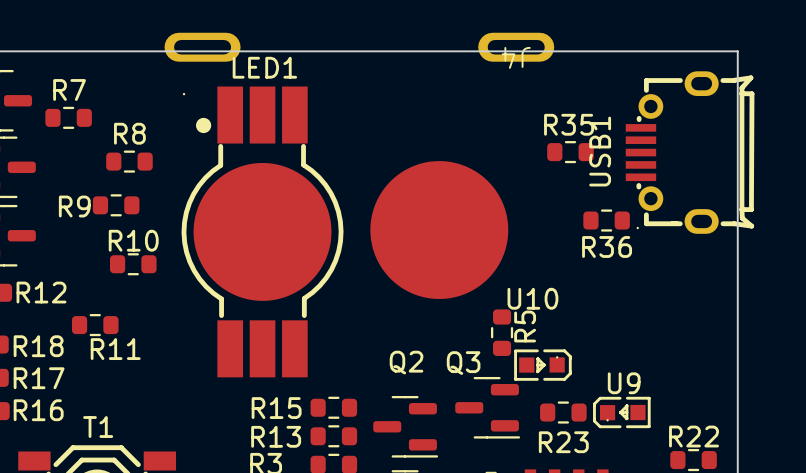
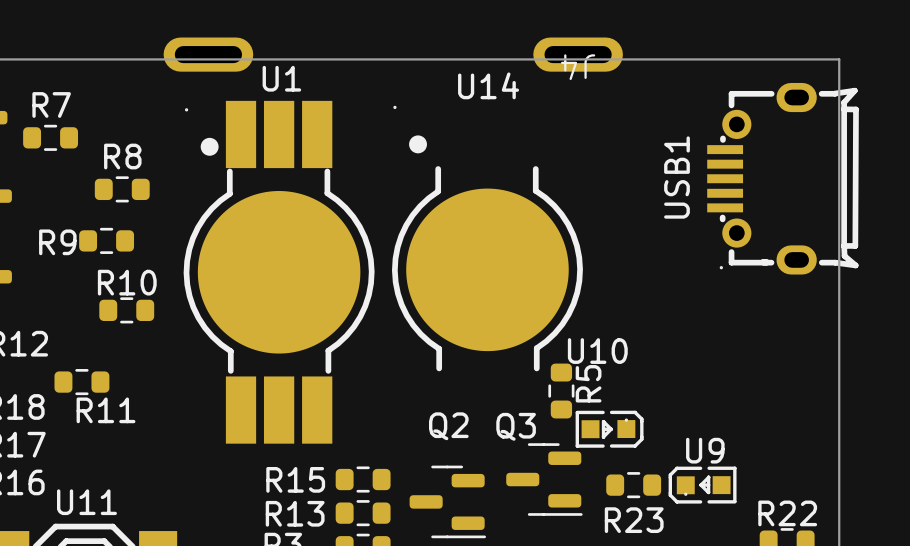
LED1 name: LED1 (264, 67) -> U1 (281, 78)
R35: (570, 152) -> none
U14: none -> (487, 238)
R36: (606, 220) -> none
T1 name: T1 (98, 427) -> U11 (86, 502)

